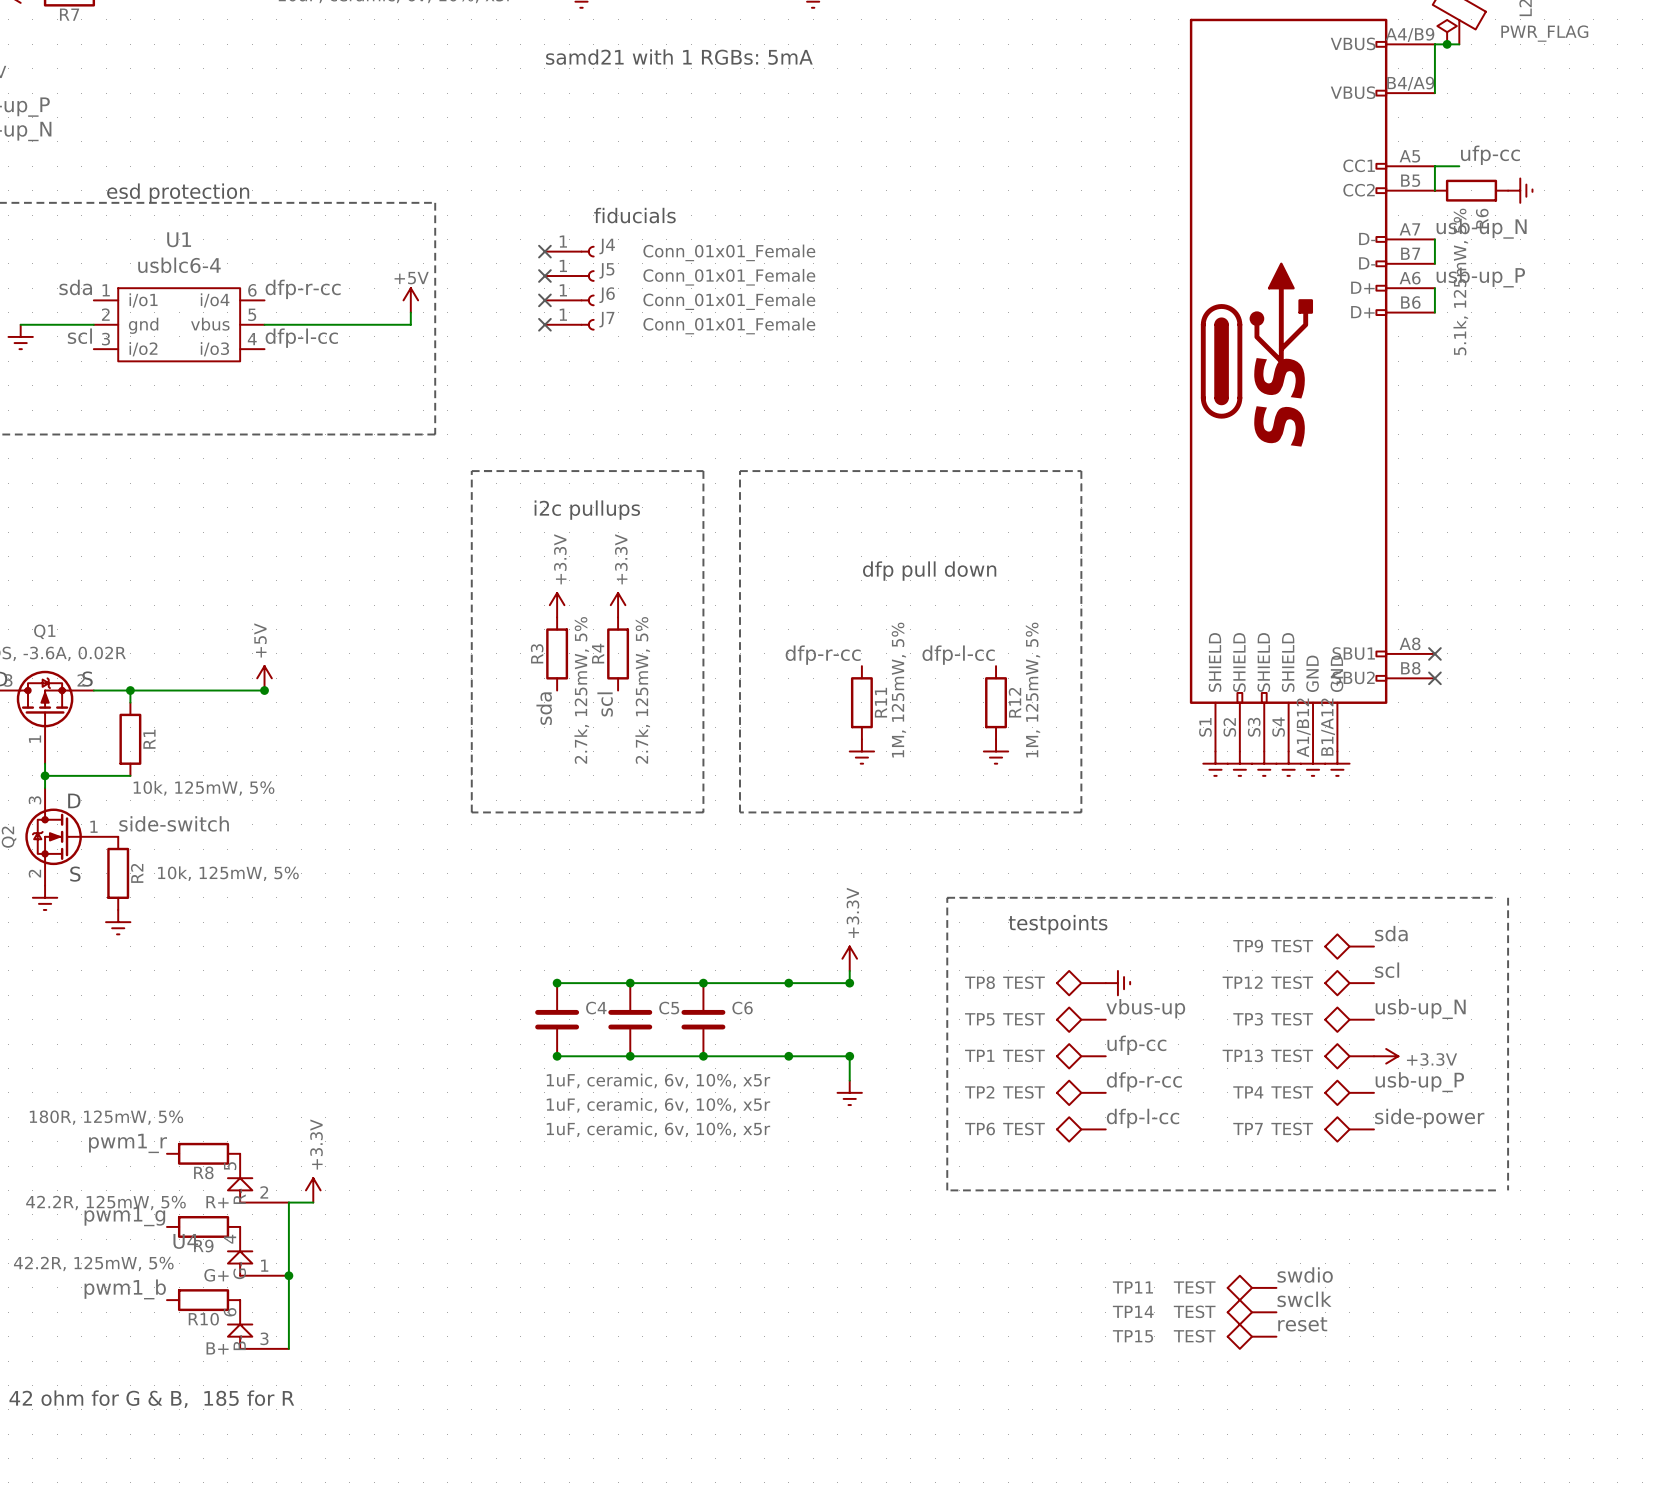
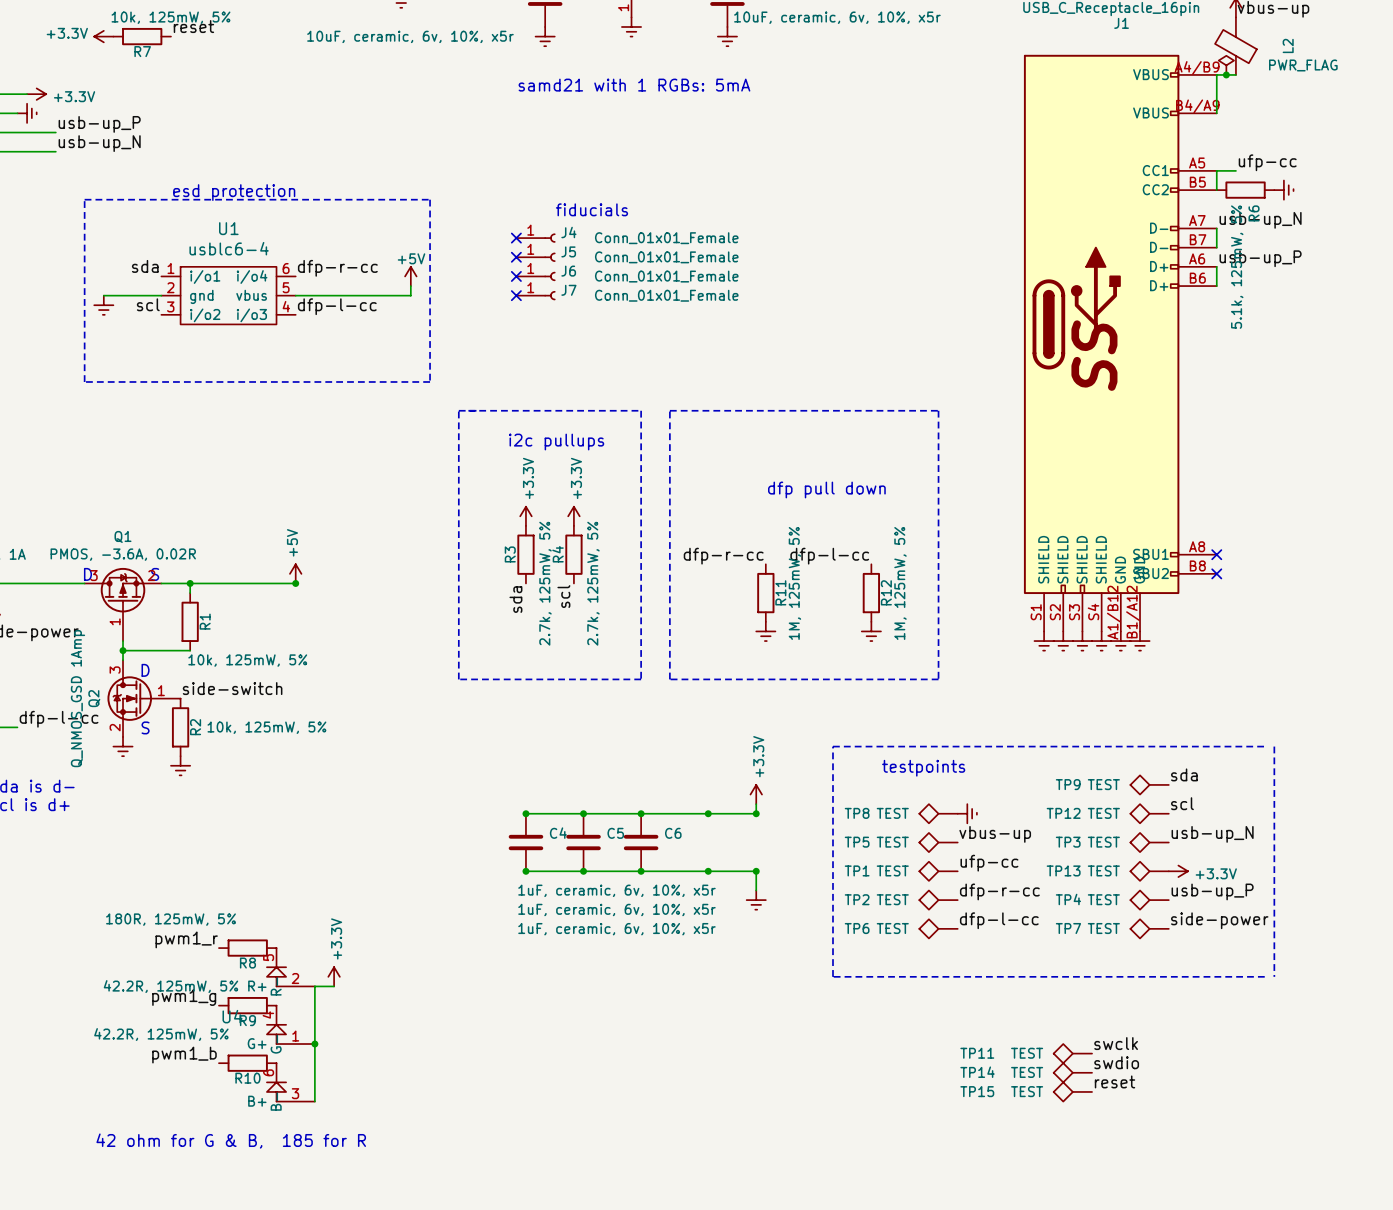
label: swdio (1305, 1274) -> swclk (1116, 1043)
label: swclk (1304, 1299) -> swdio (1116, 1062)

